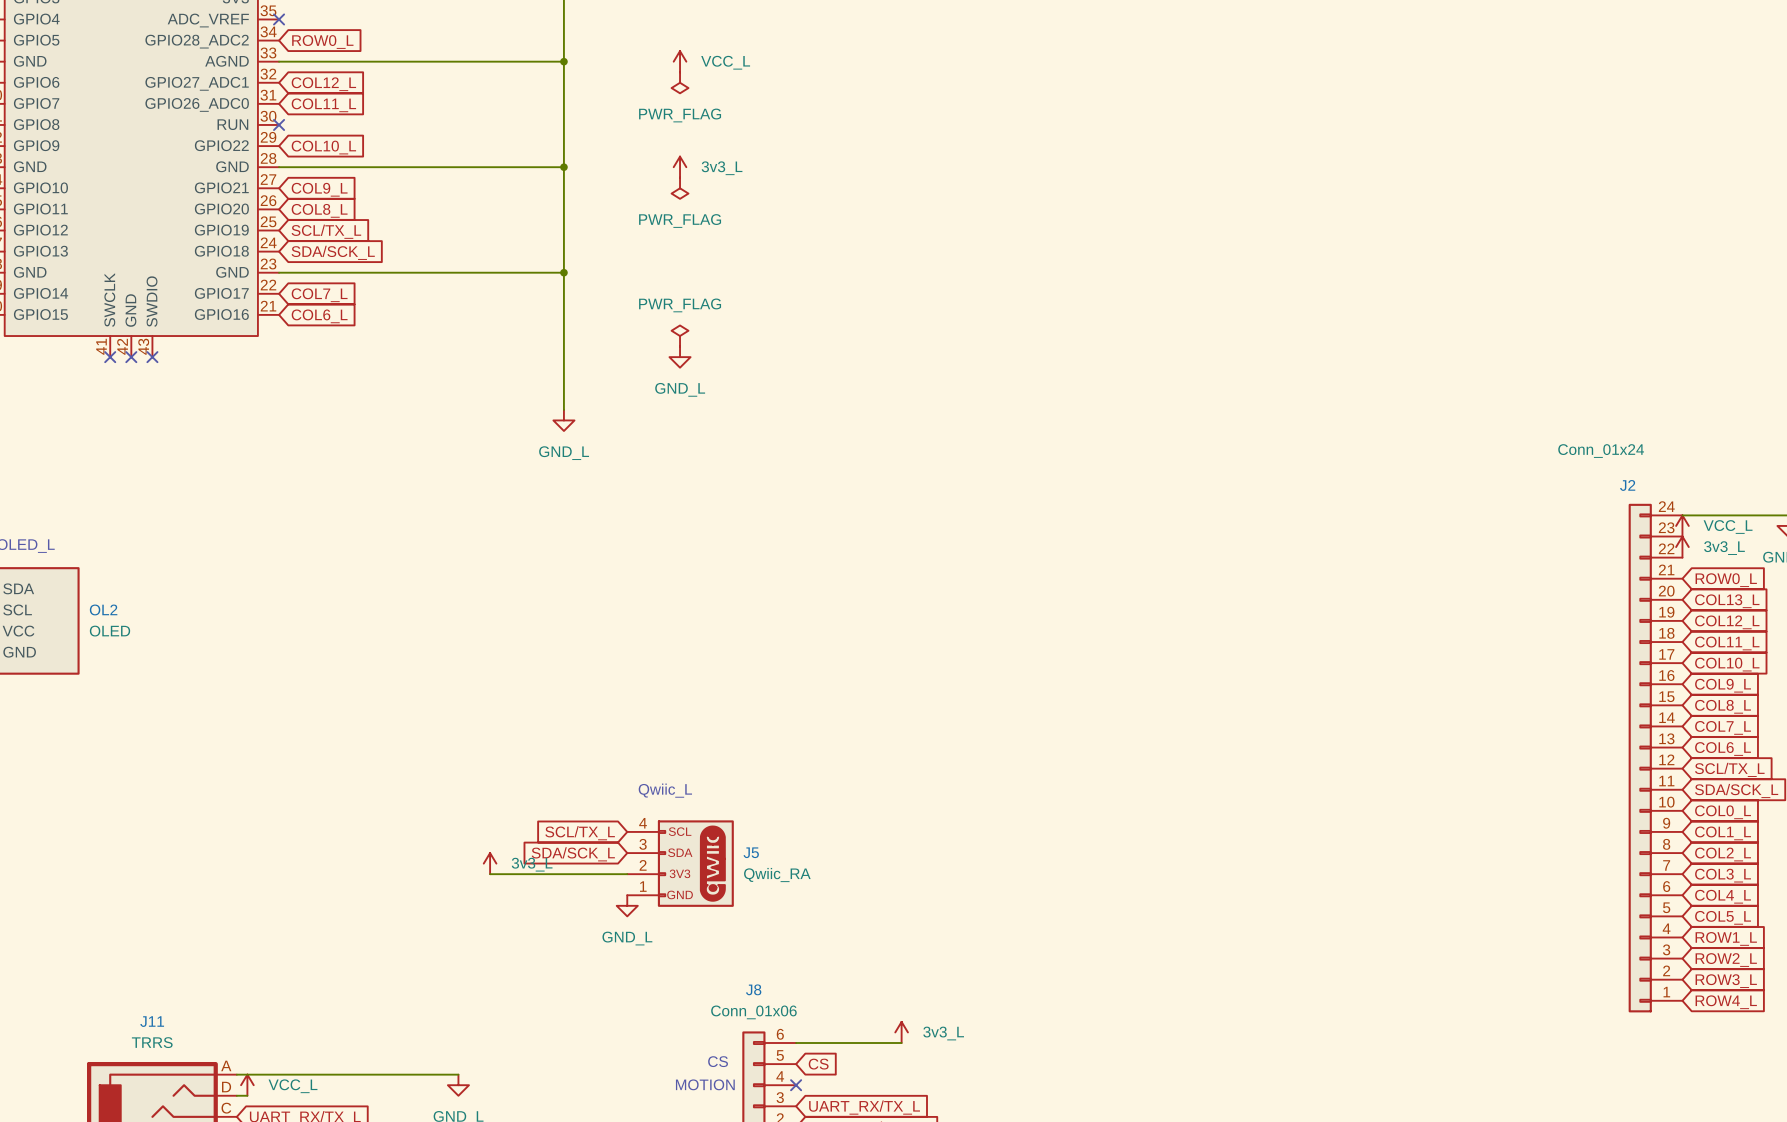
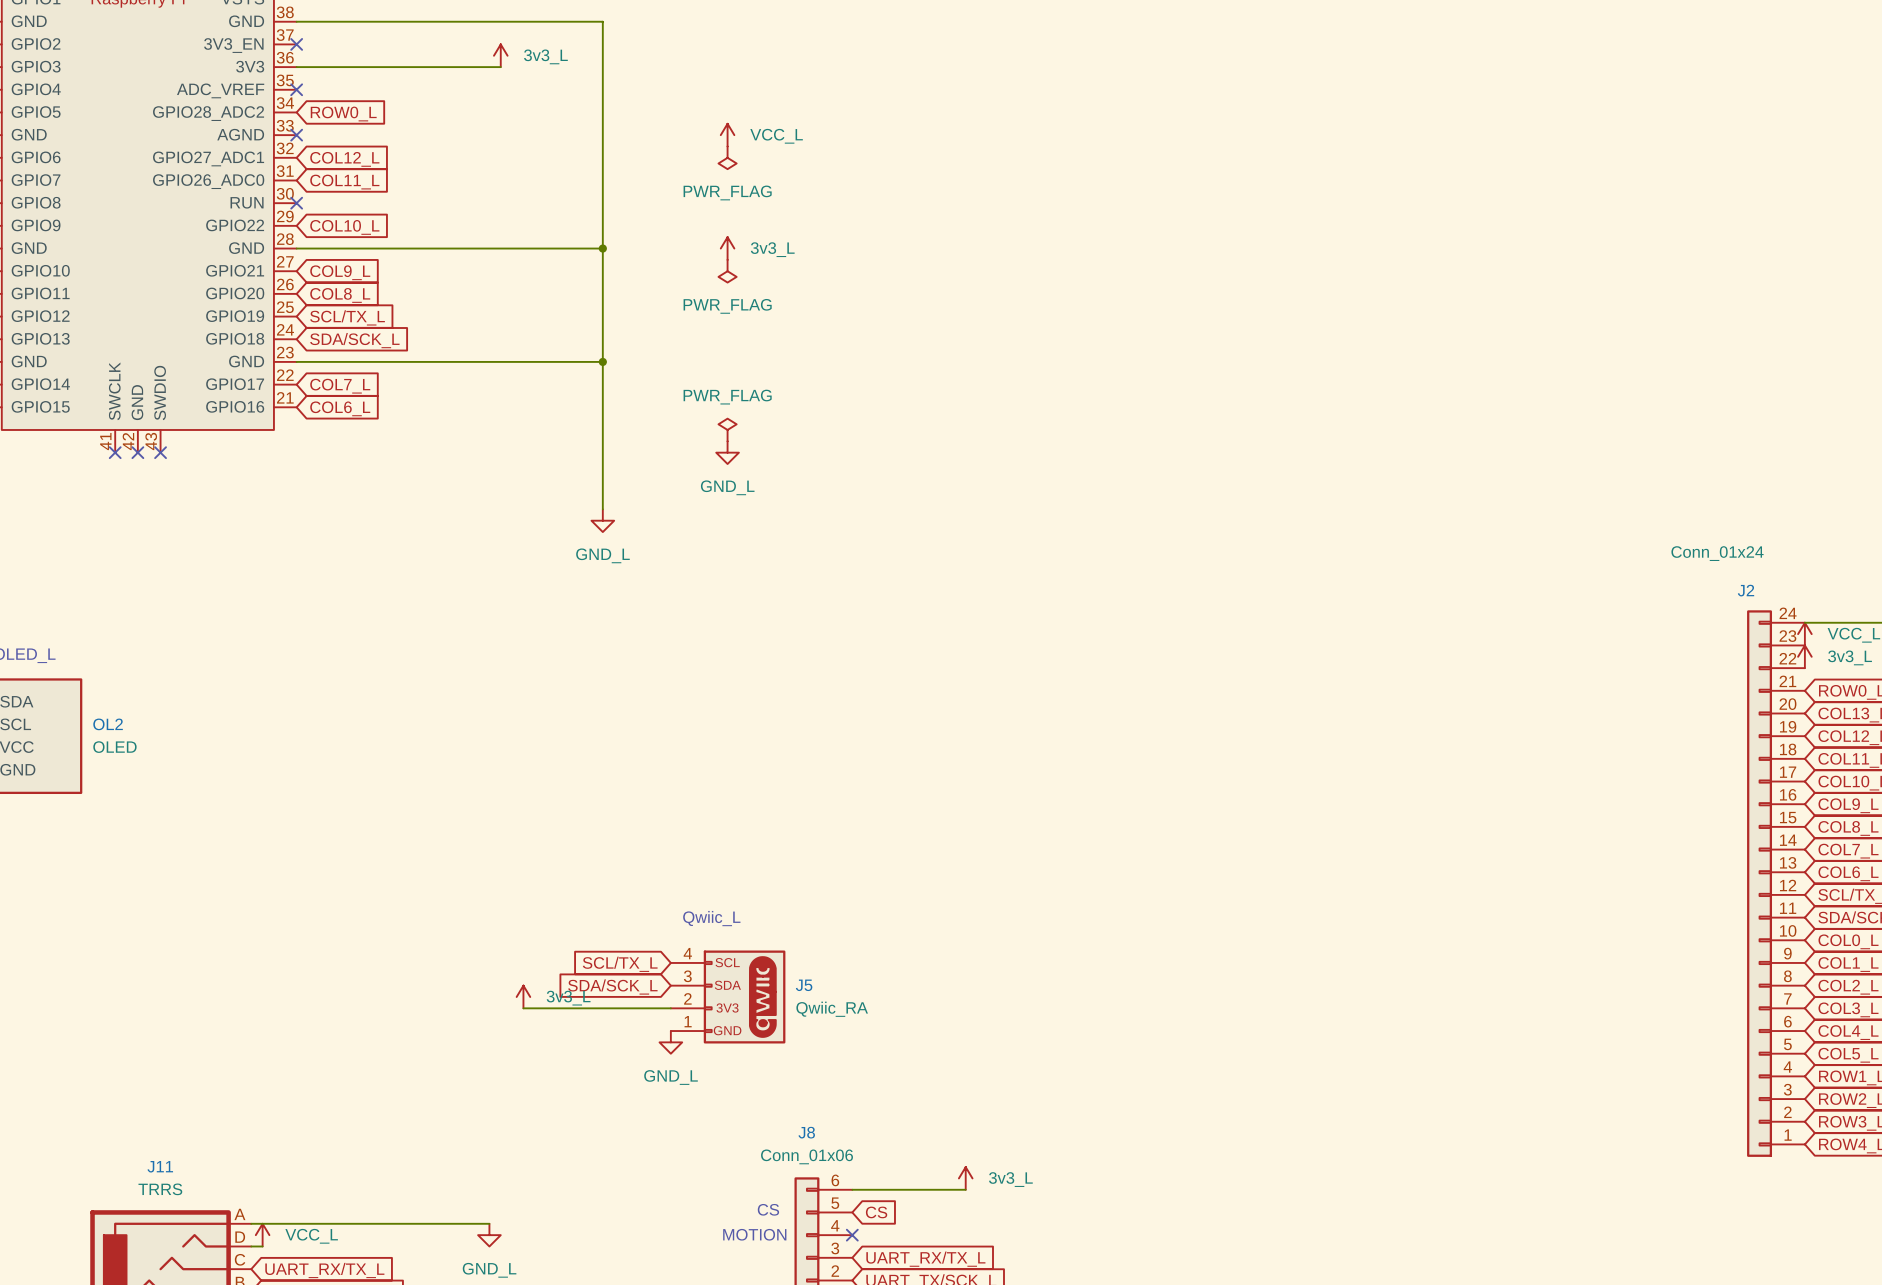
wire: (279, 61) (563, 61) -> none
no-connect mark: none -> (296, 135)
junction: (563, 61) -> none

